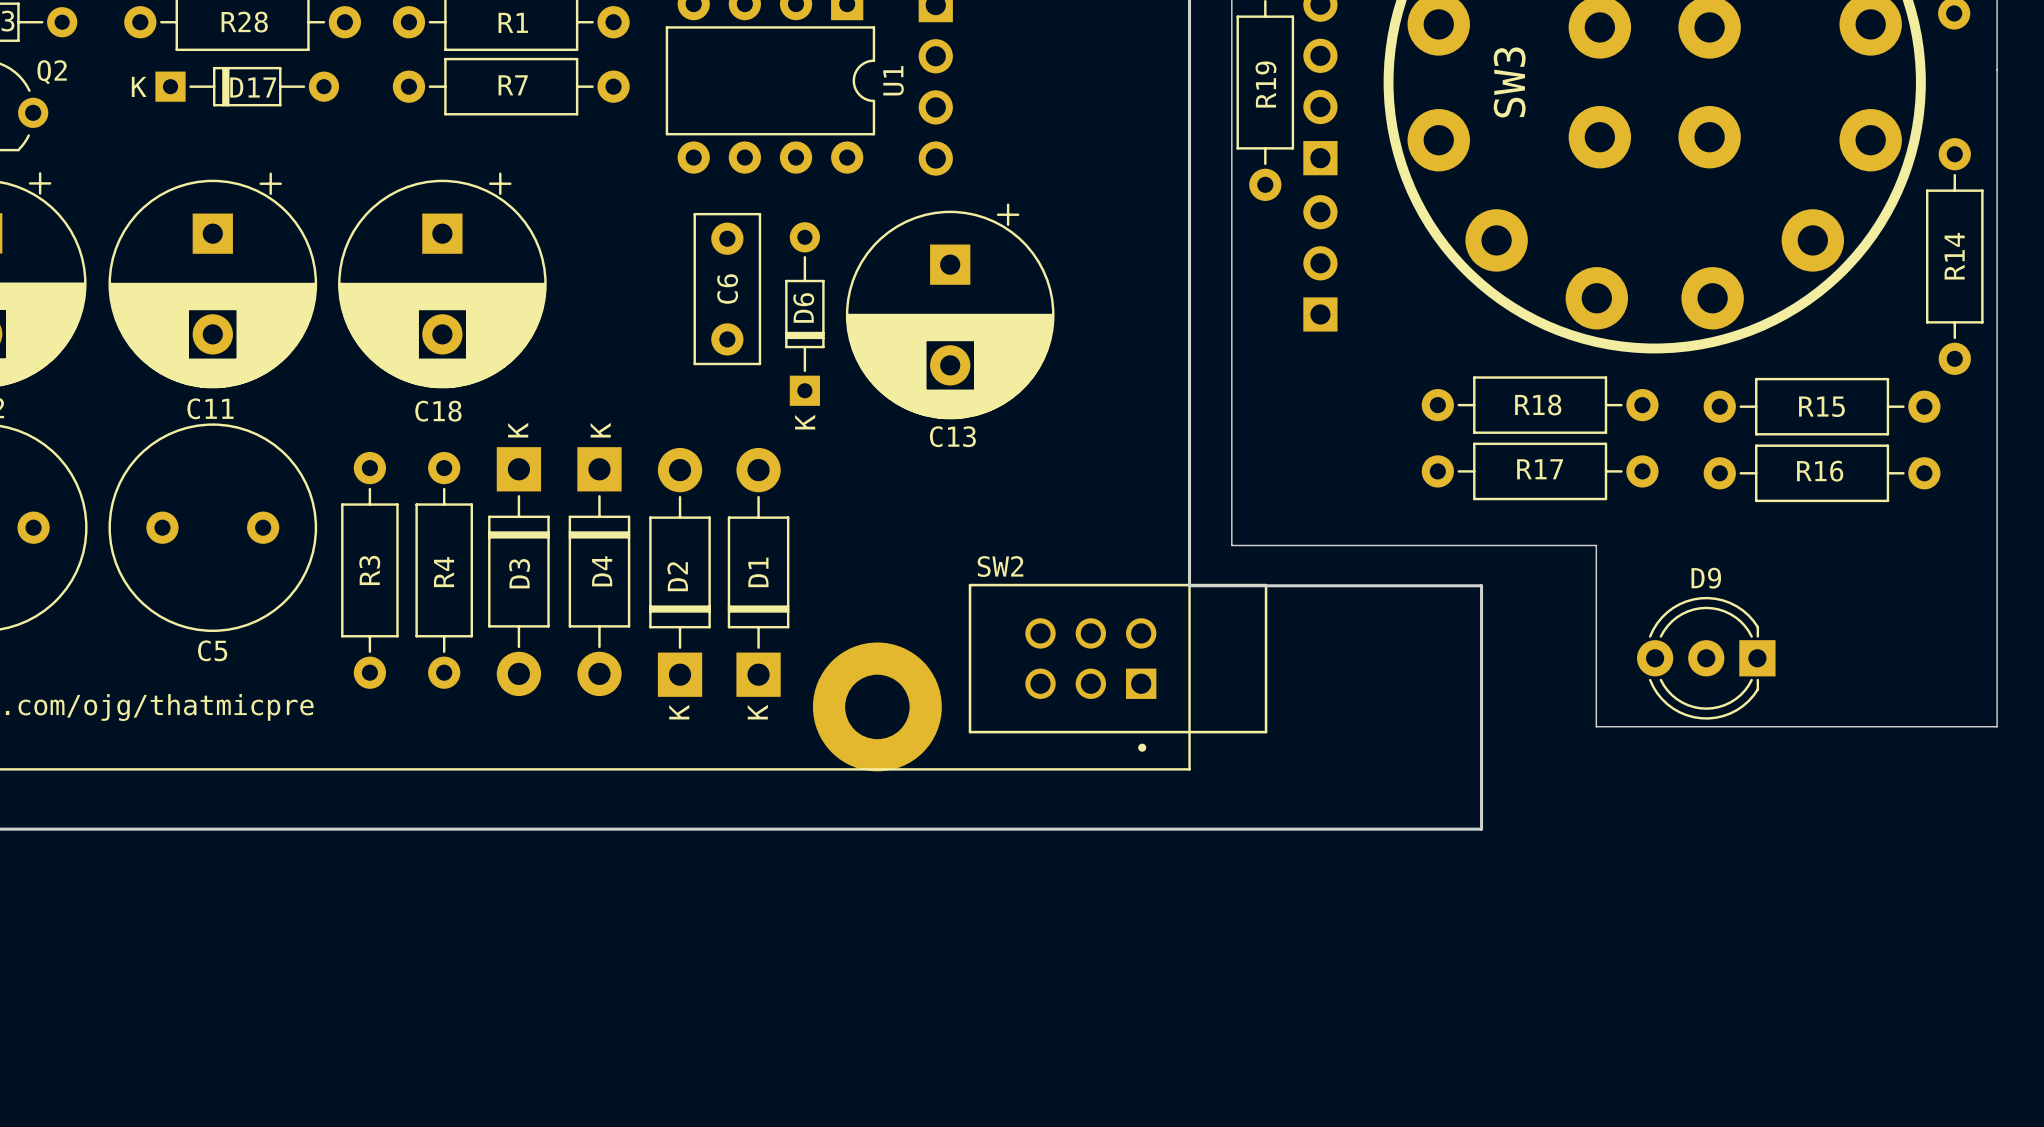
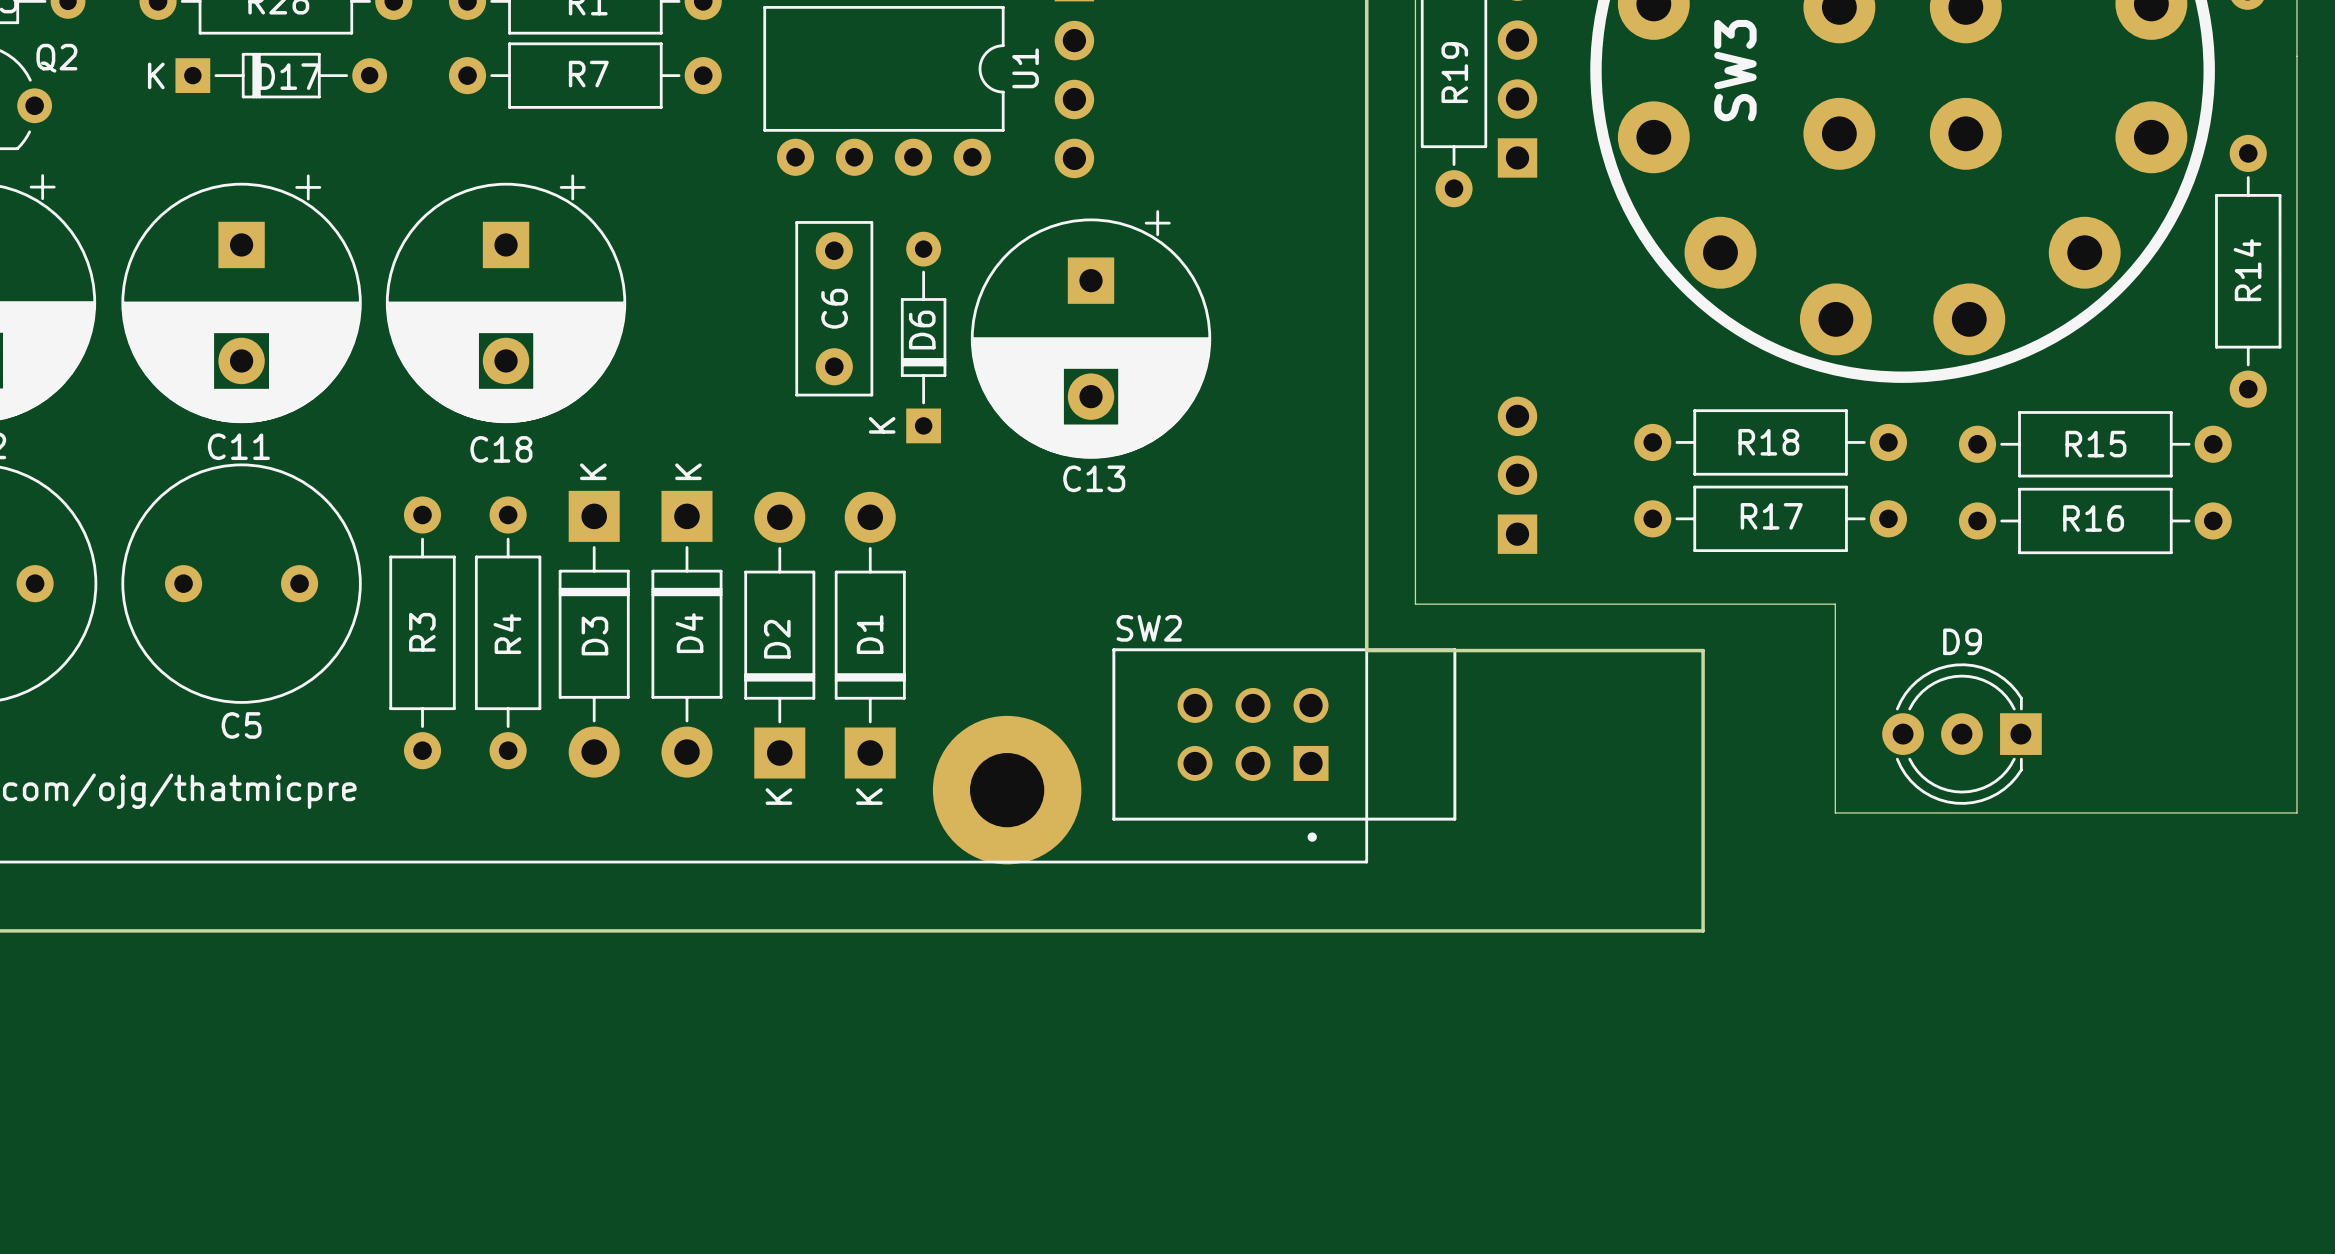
part position: (1320, 263) -> (1517, 475)
D6 text position: K (805, 422) -> K (882, 425)

